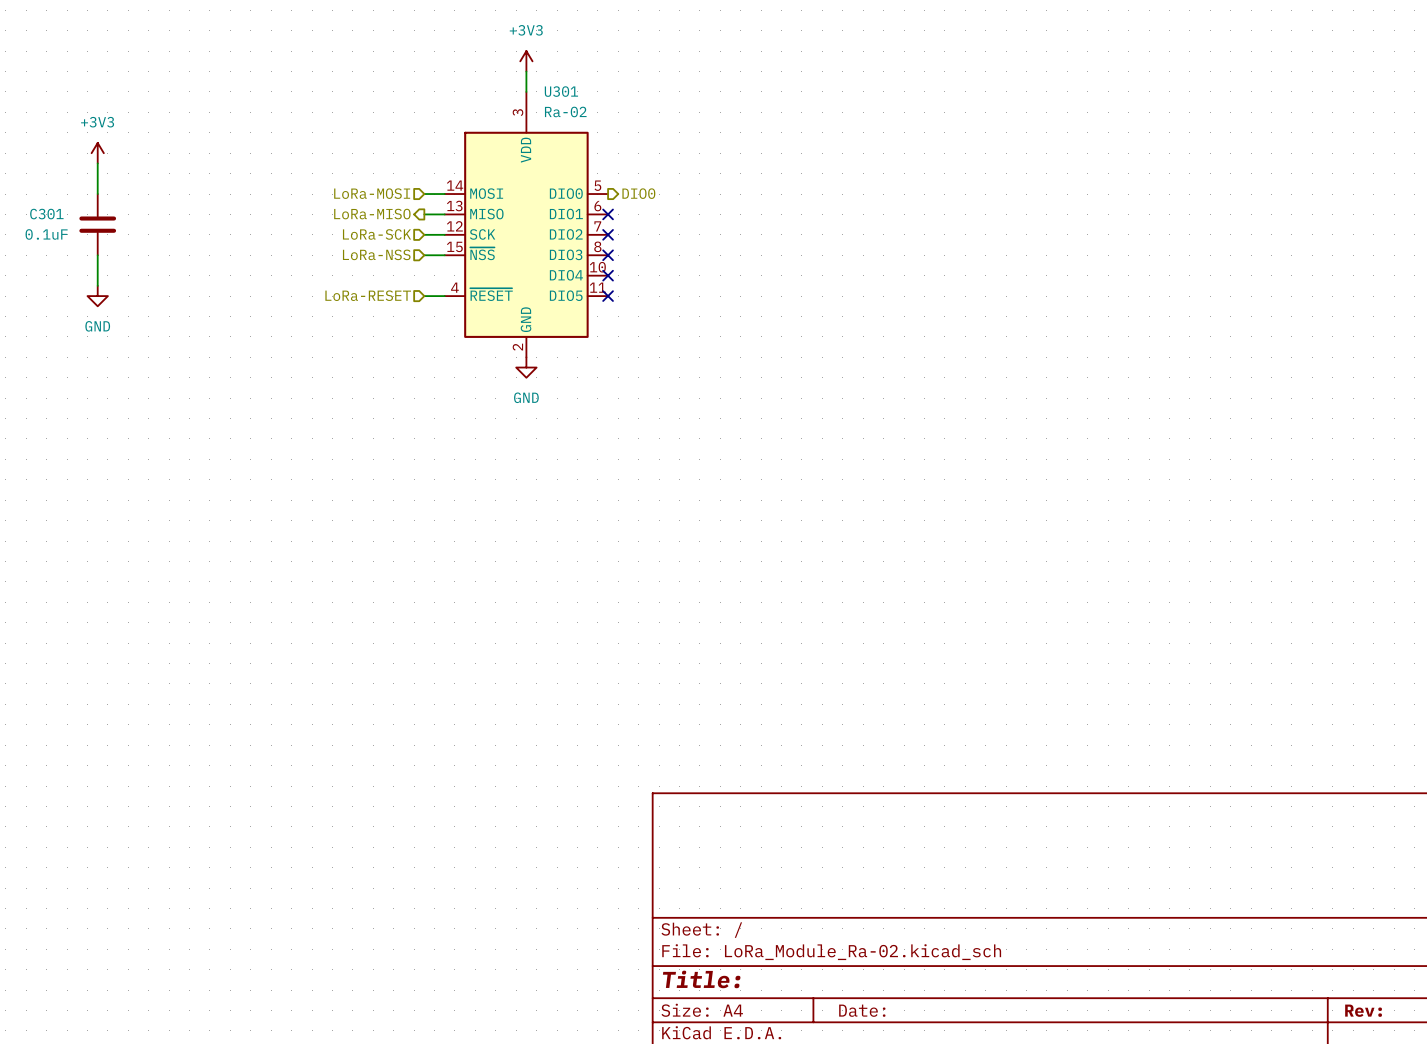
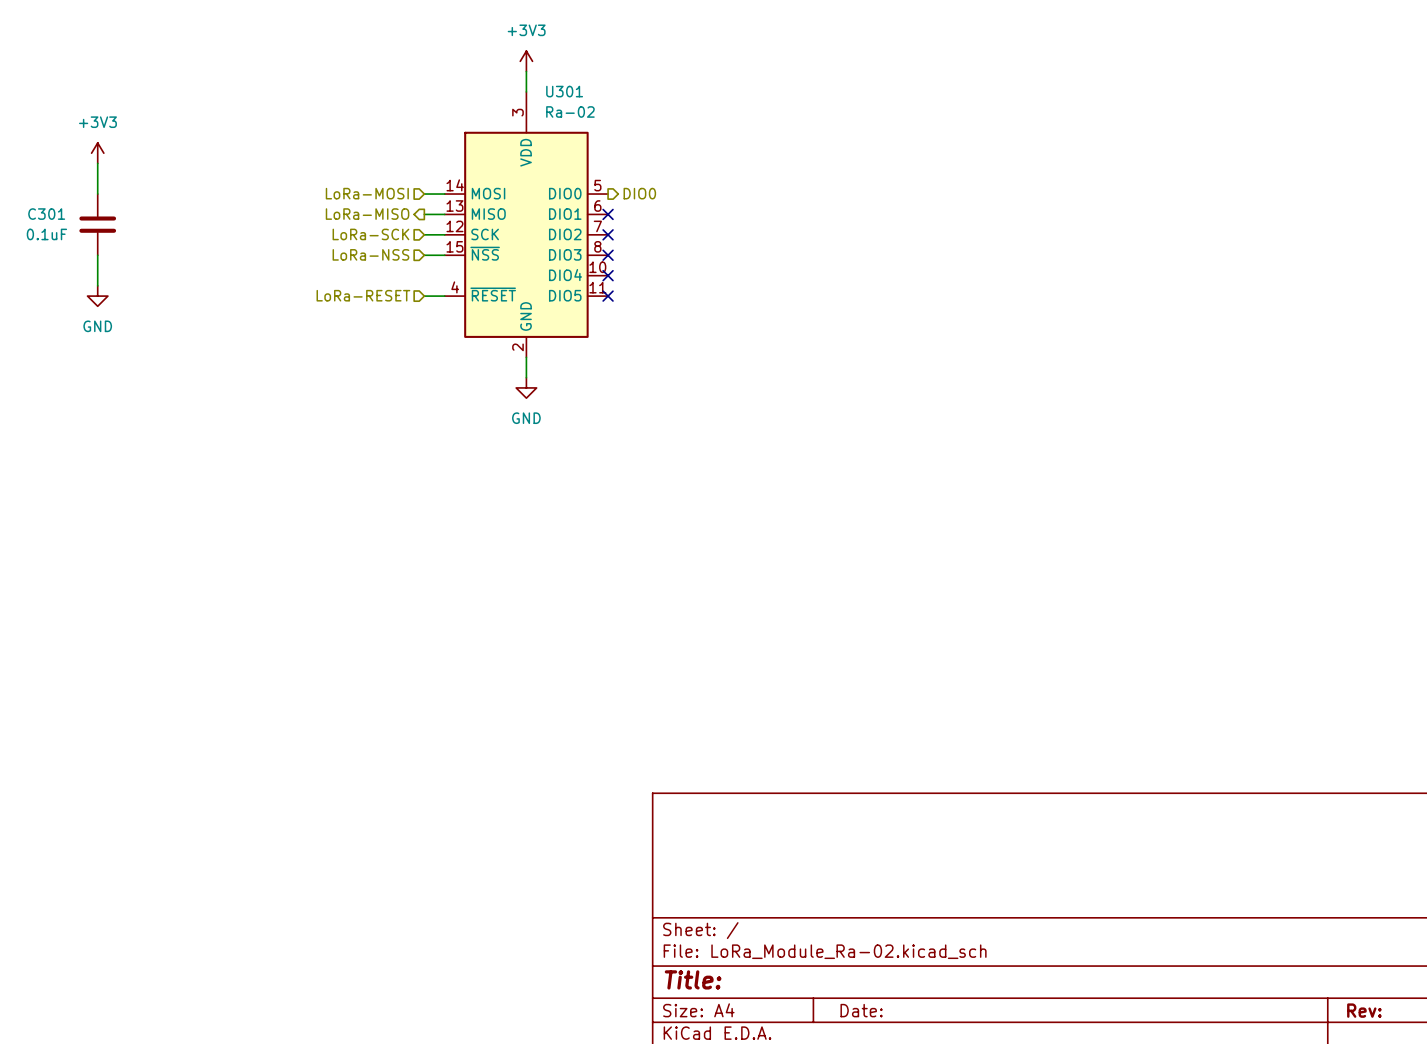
power symbol position: GND (526, 367) -> GND (526, 387)

